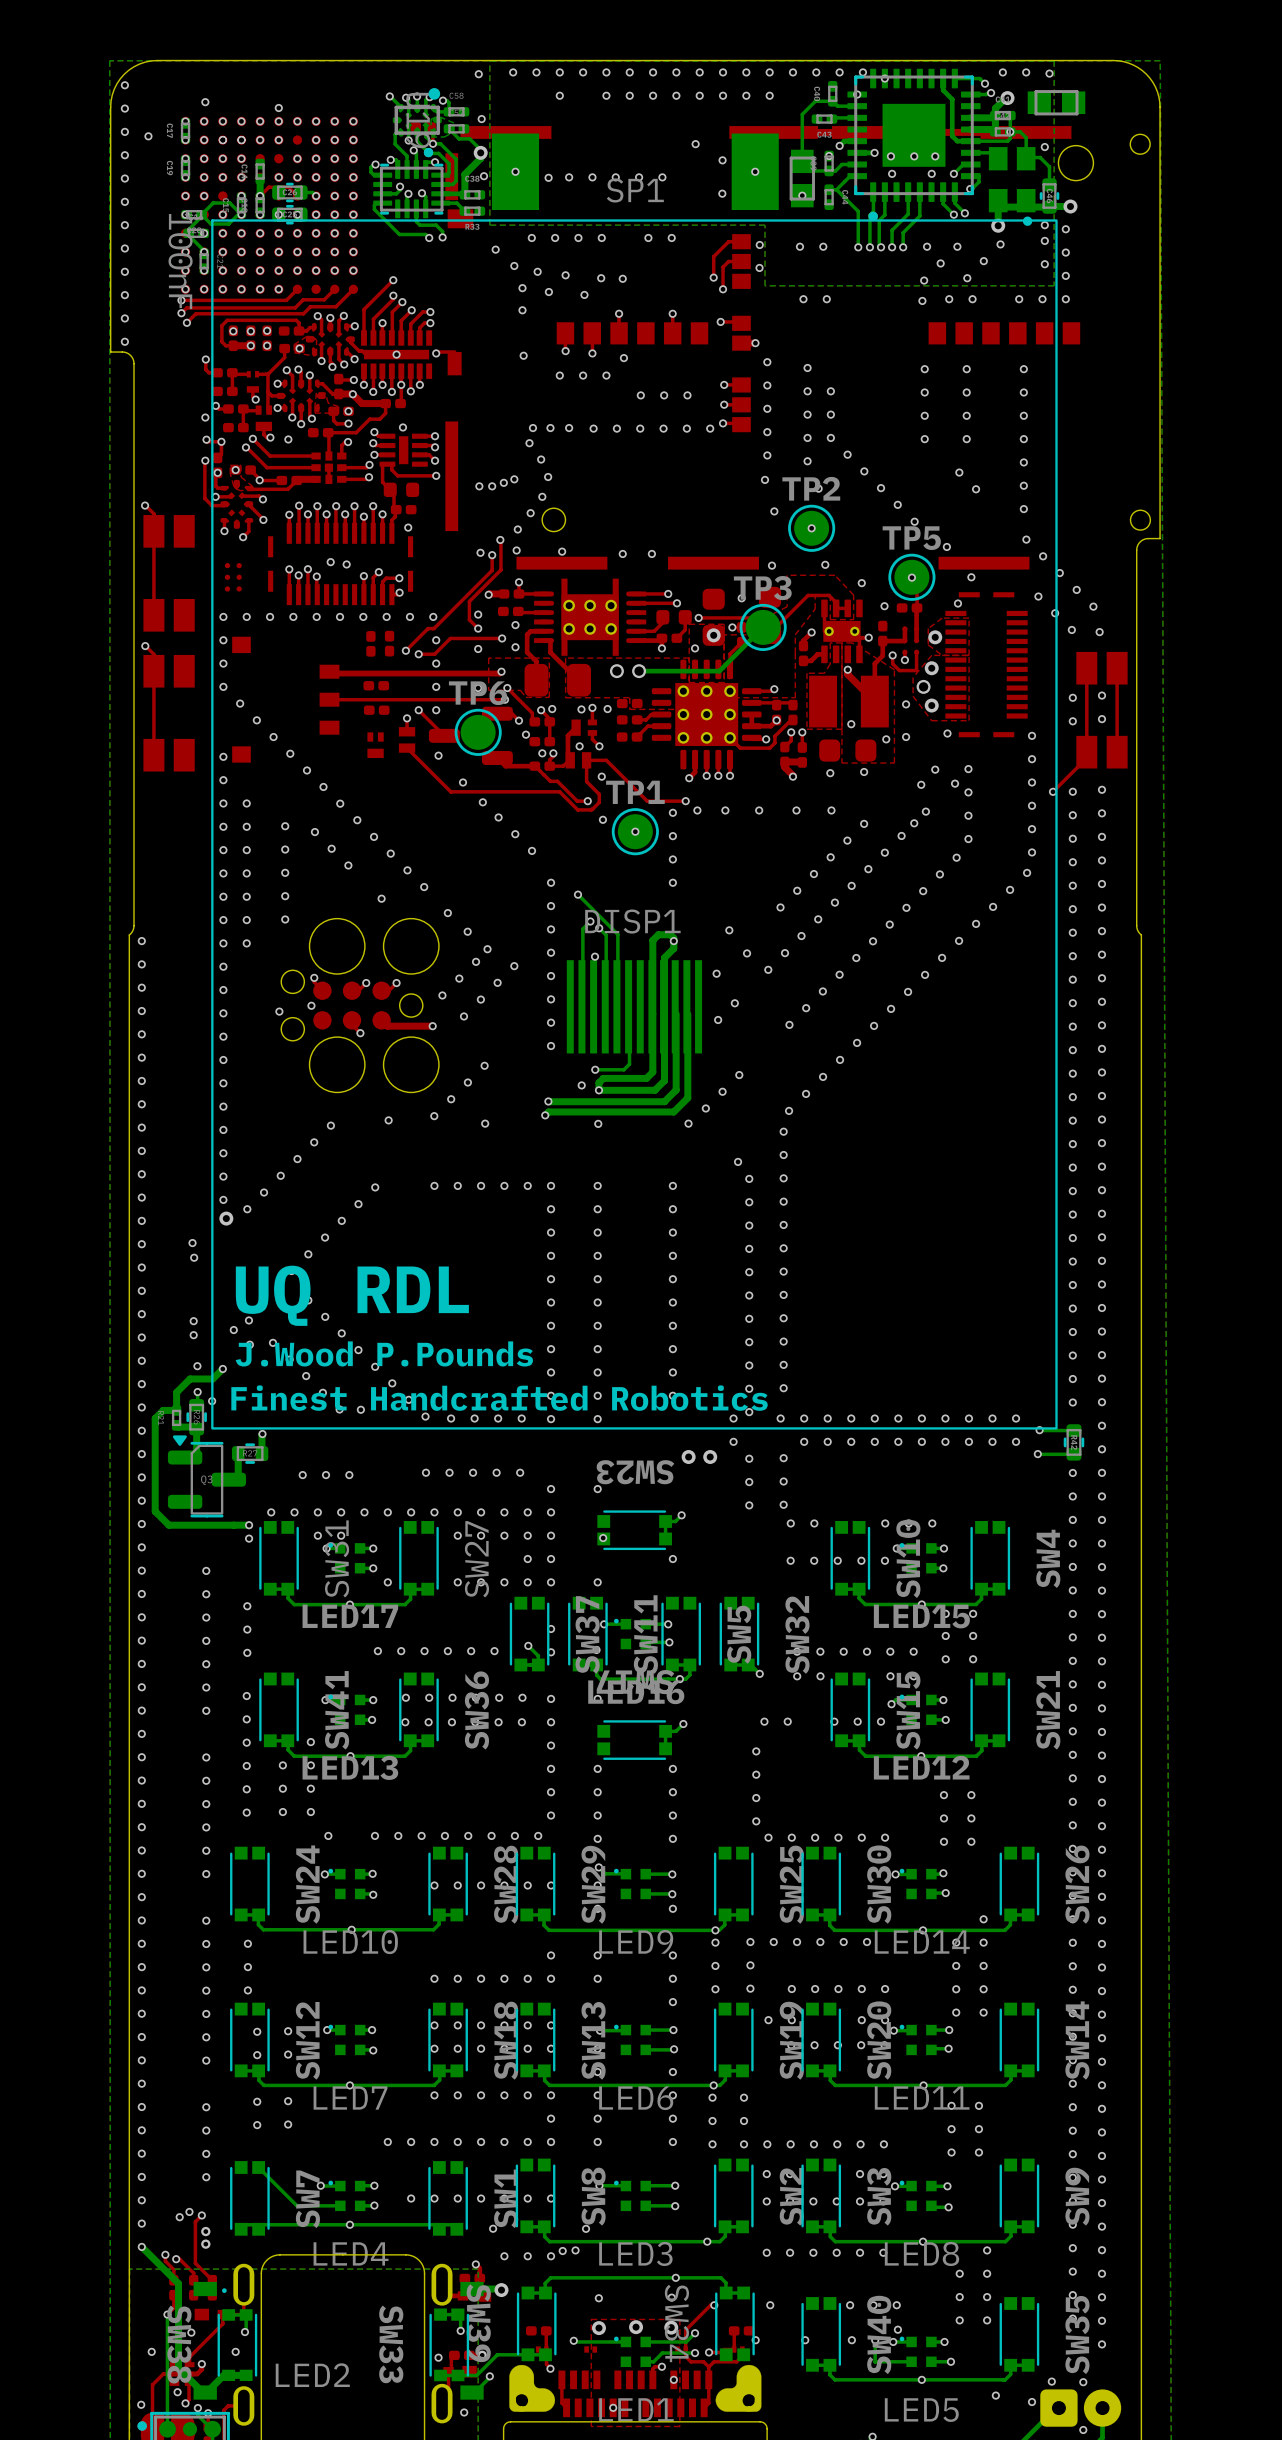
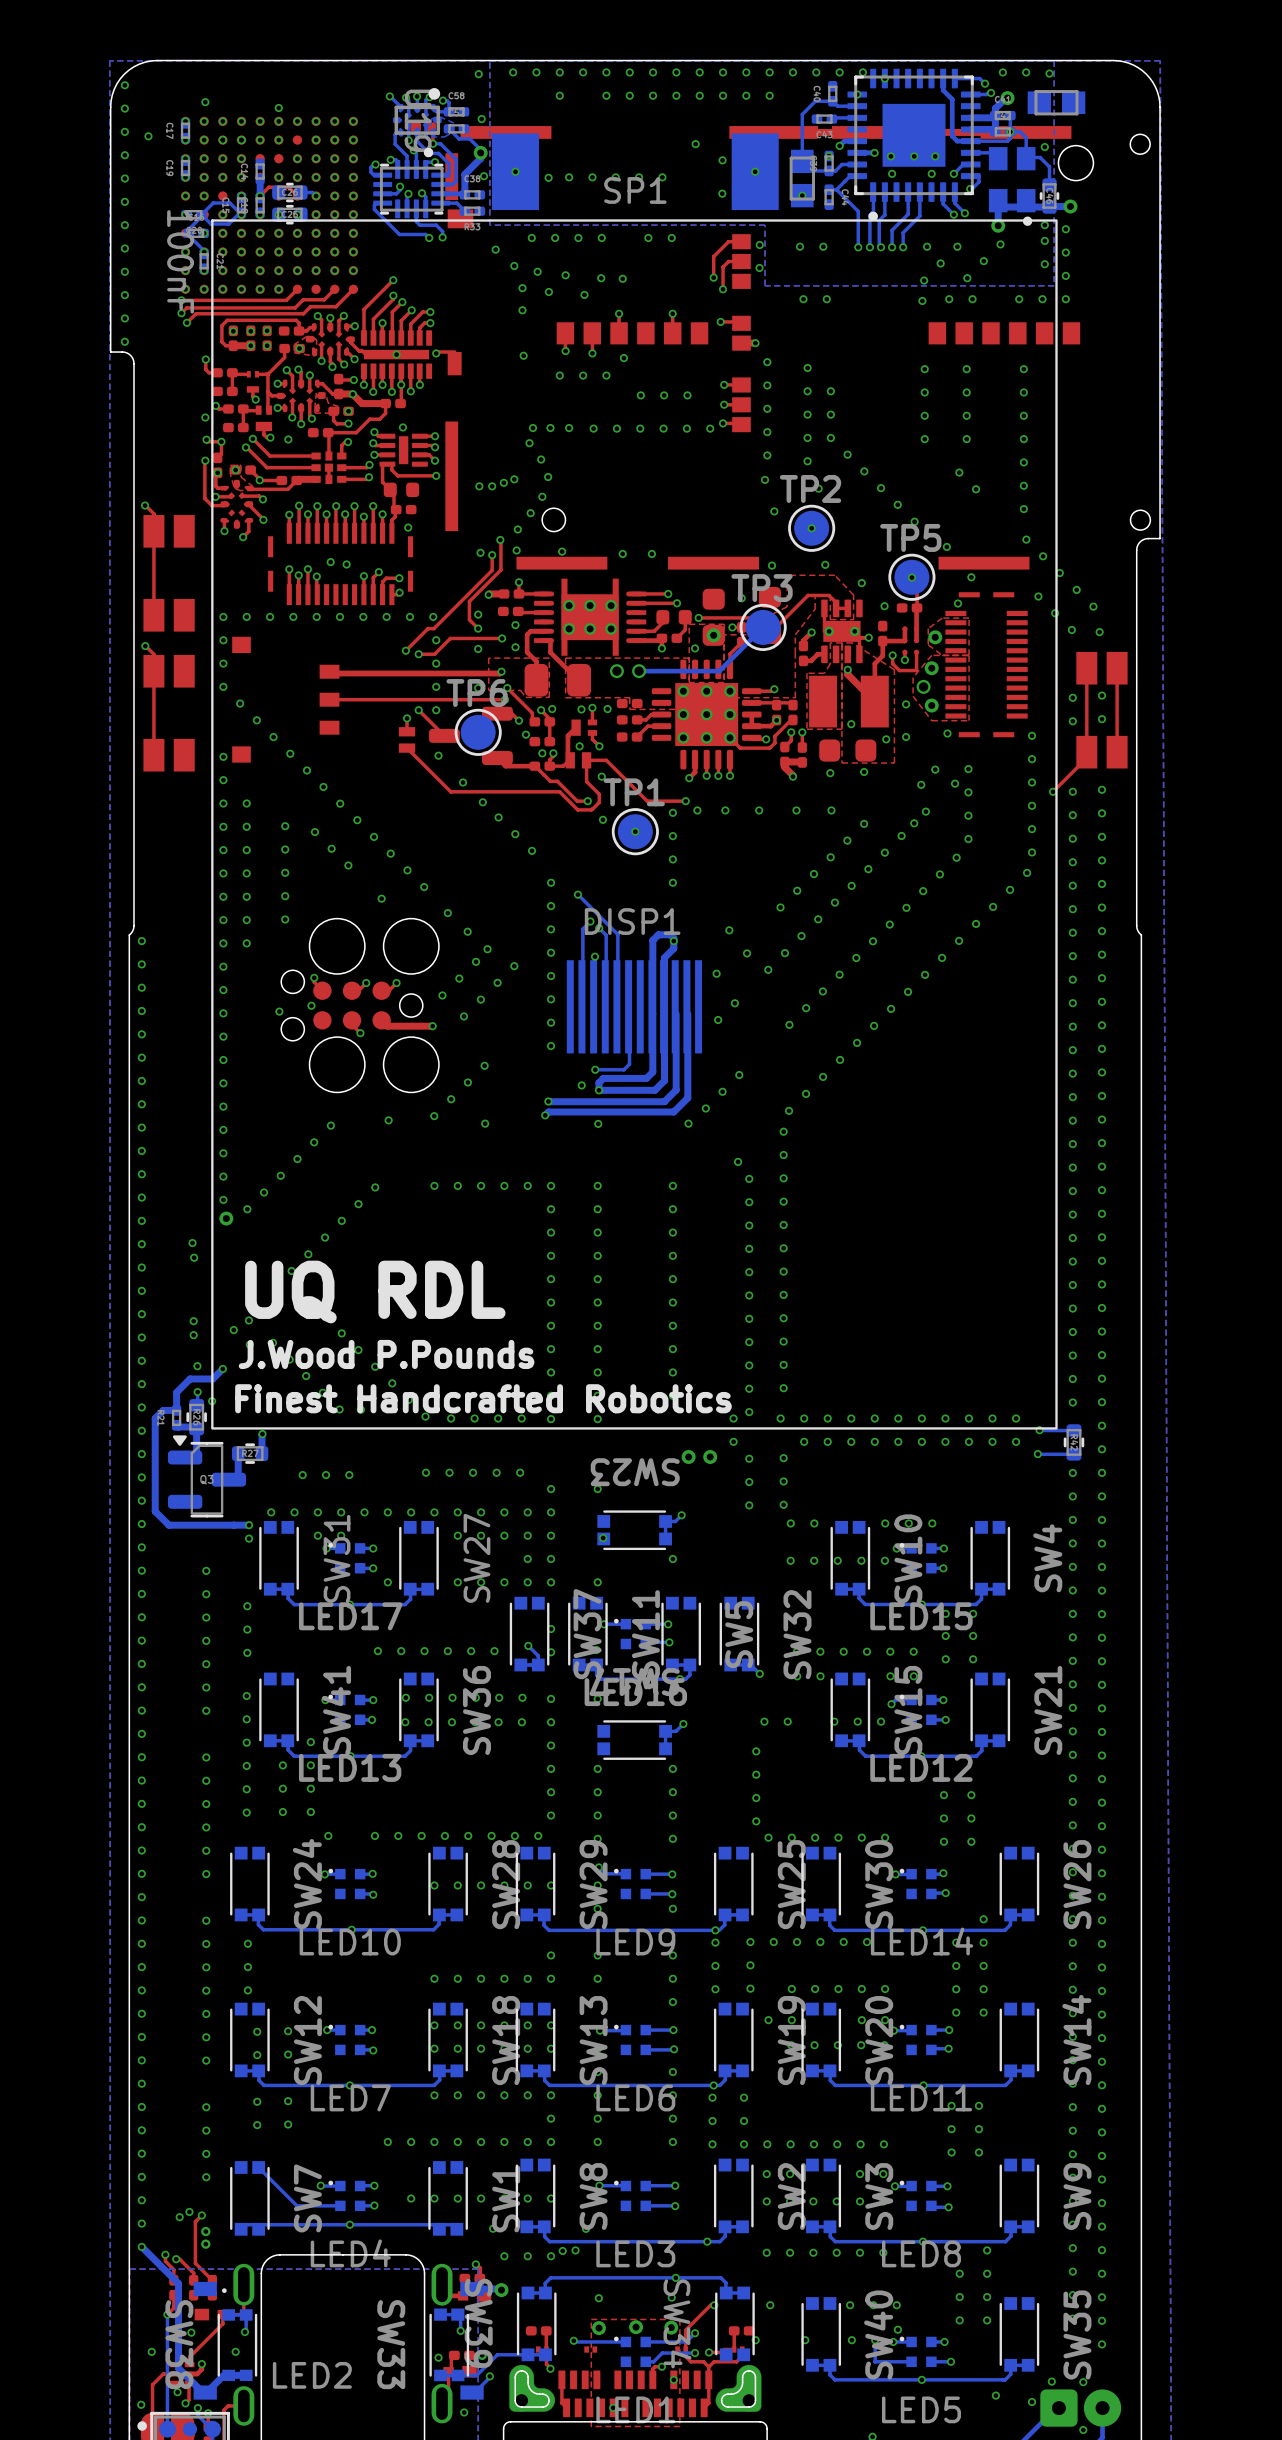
part: (233, 577) -> none
part: (370, 643) -> none
part: (389, 643) -> none
part: (376, 685) -> none
part: (376, 710) -> none
part: (375, 745) -> none

